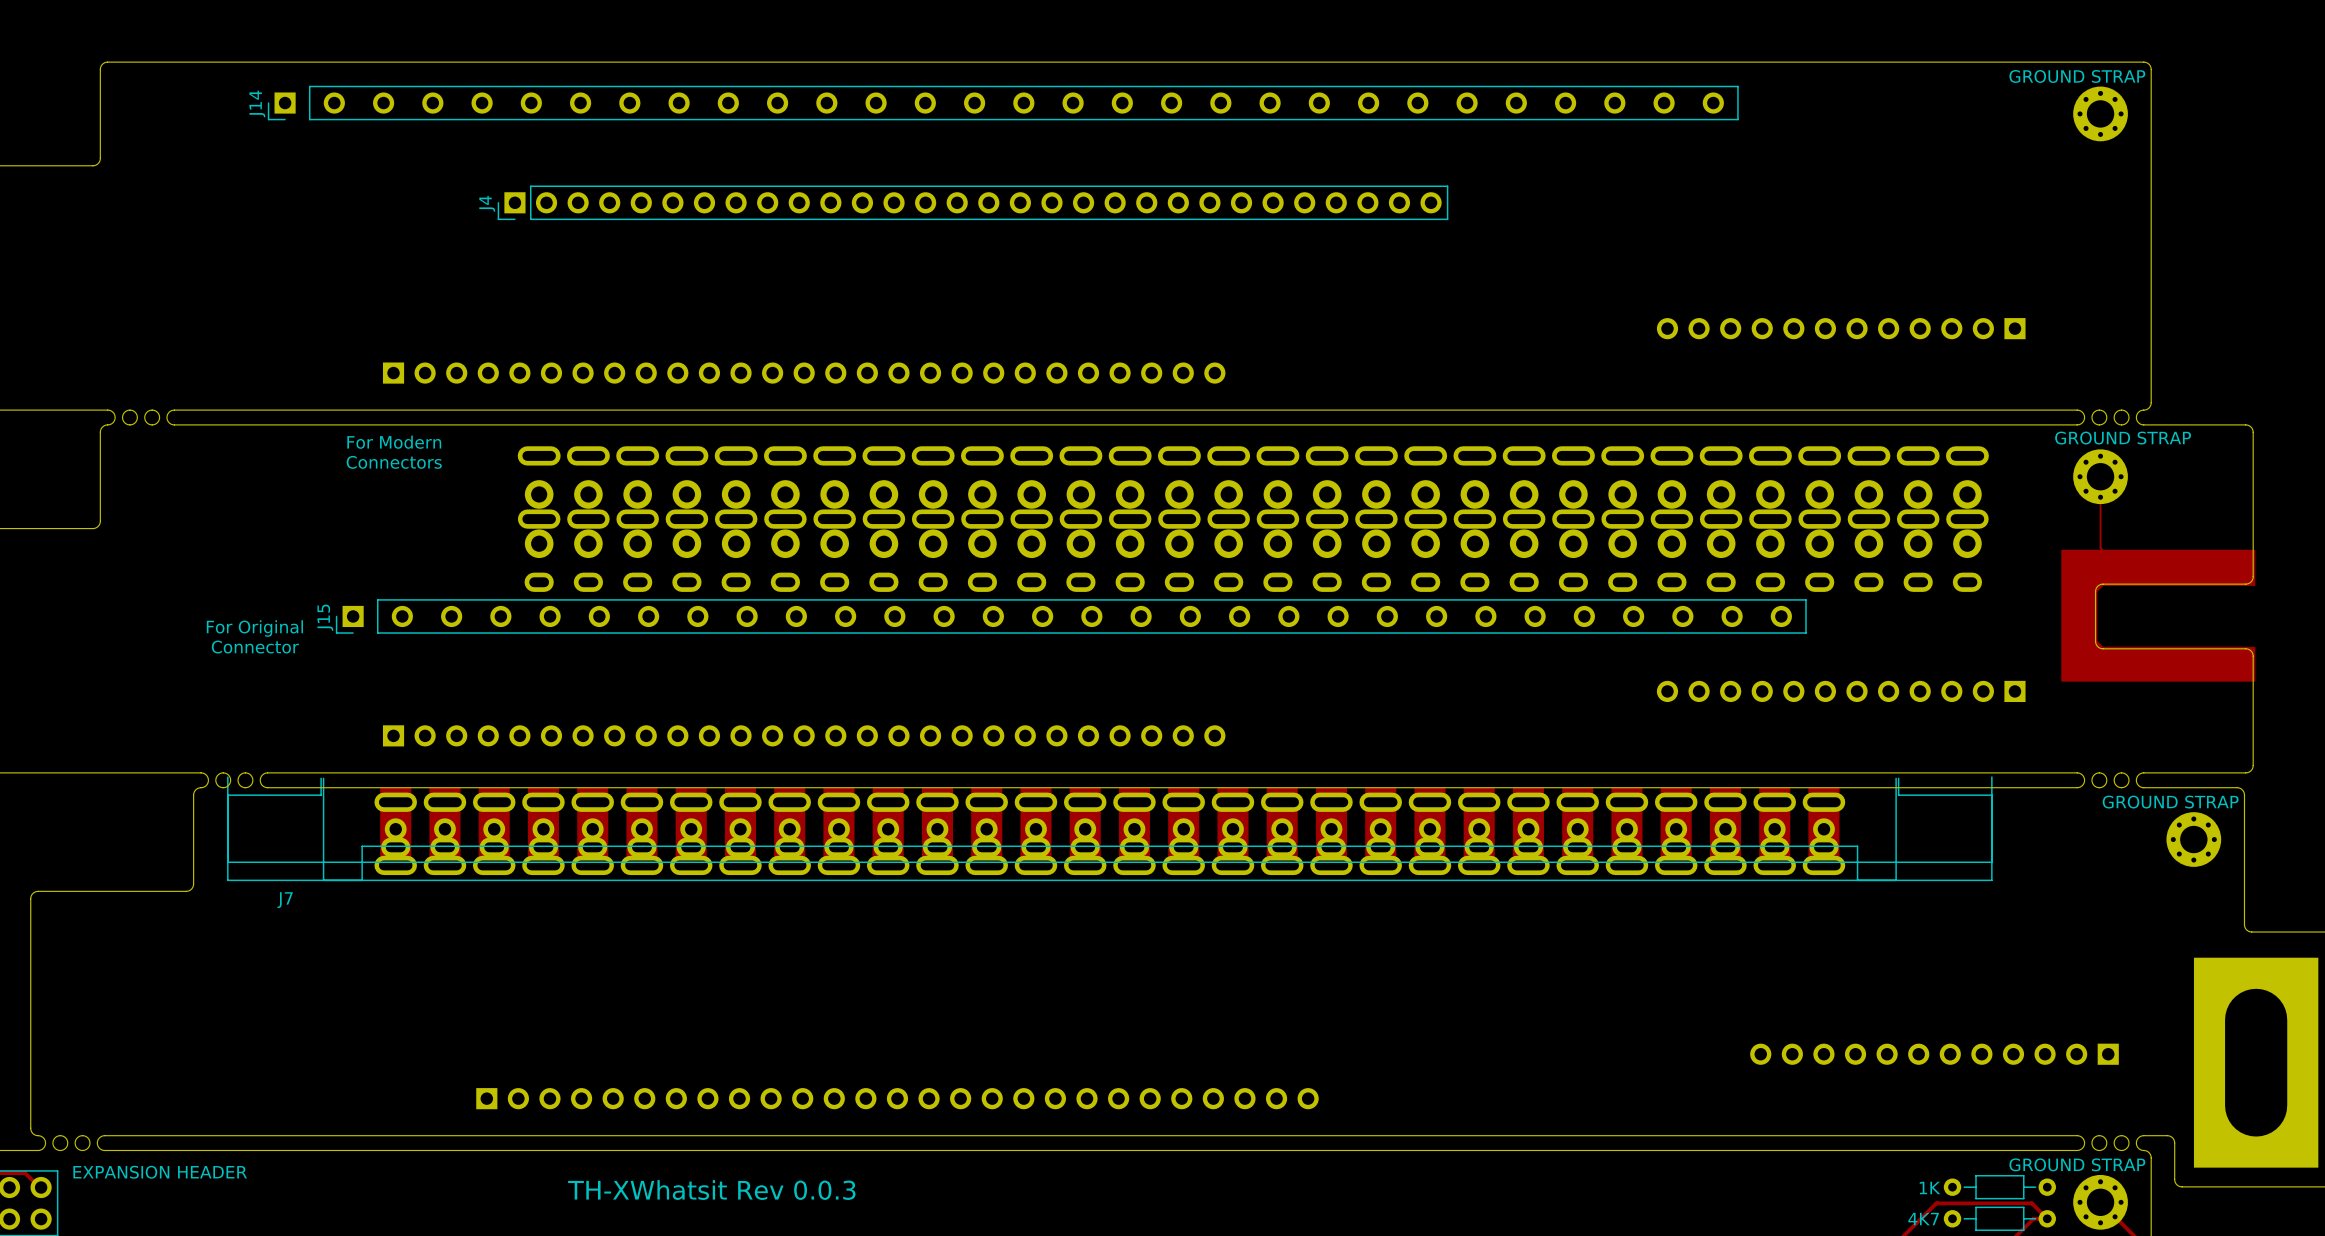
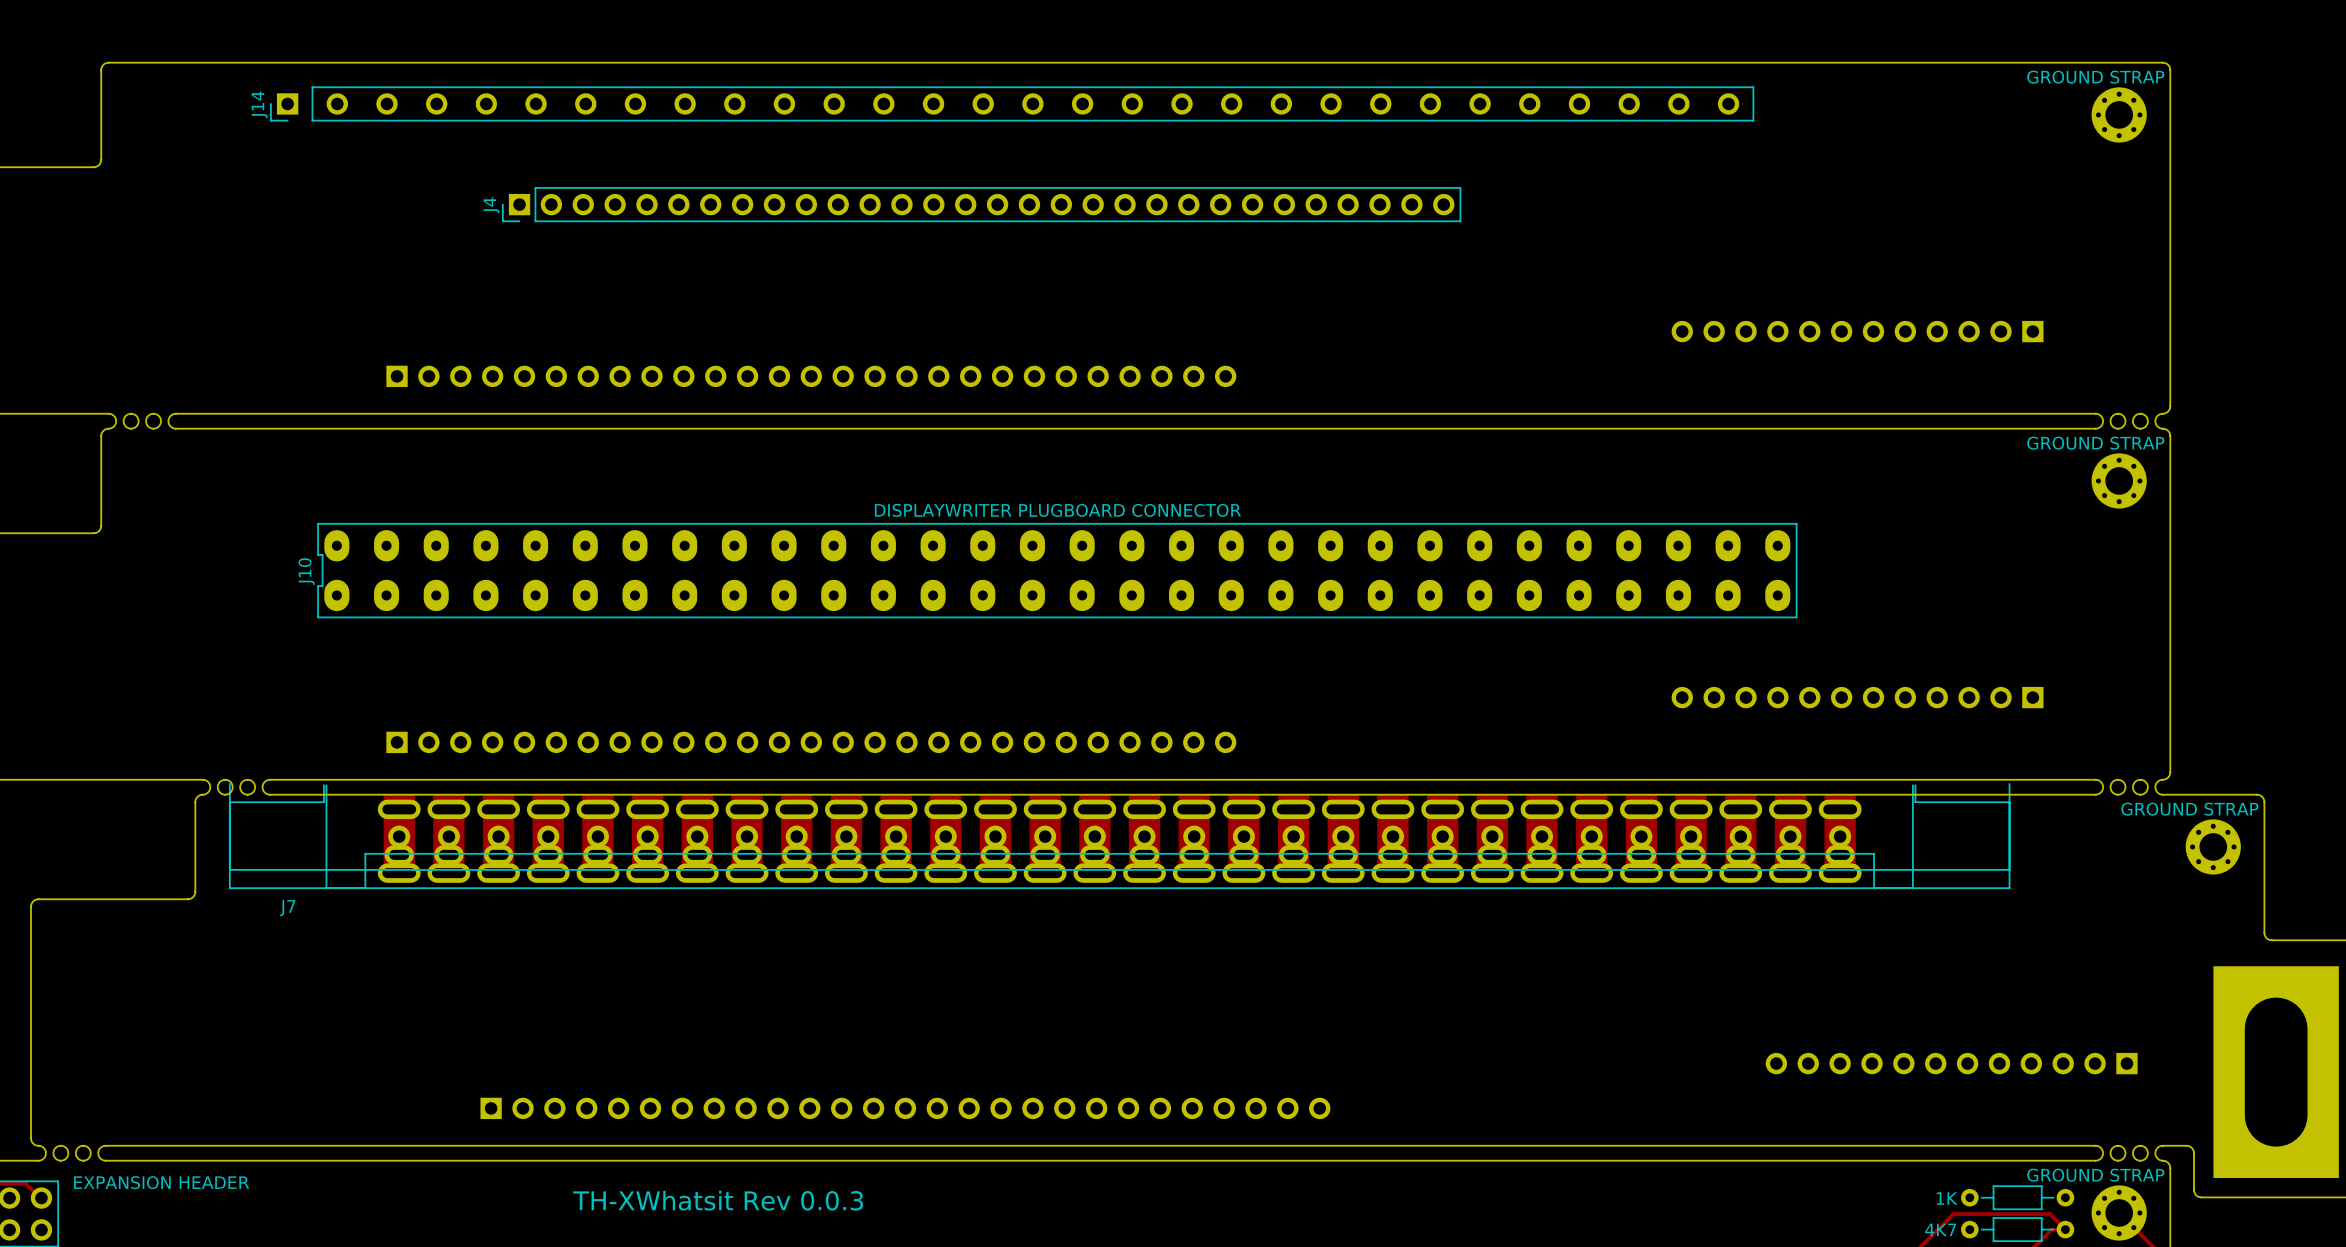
board edge: (2143, 424) (2246, 424) (2251, 427) (2253, 432) (2253, 576) (2251, 581) (2245, 584) (2102, 584) (2097, 586) (2095, 591) (2095, 642) (2100, 648) (2245, 648) (2251, 650) (2253, 656) (2252, 767) (2250, 771) (2245, 772) (2143, 772) -> (2162, 428) (2168, 430) (2170, 436) (2170, 772) (2168, 777) (2162, 779)
part value position: GROUND STRAP (2123, 438) -> GROUND STRAP (2095, 443)
text: For Modern (394, 442) -> none
text: Connectors (394, 462) -> none
track: (2100, 476) (2100, 547) (2114, 561) -> none
part: (1253, 519) -> none
drawing: [2061, 549, 2256, 682] -> none
J10: none -> DISPLAYWRITER PLUGBOARD CONNECTOR (1057, 570)
J15: (1071, 616) -> none
text: For Original (254, 628) -> none
text: Connector (255, 647) -> none

